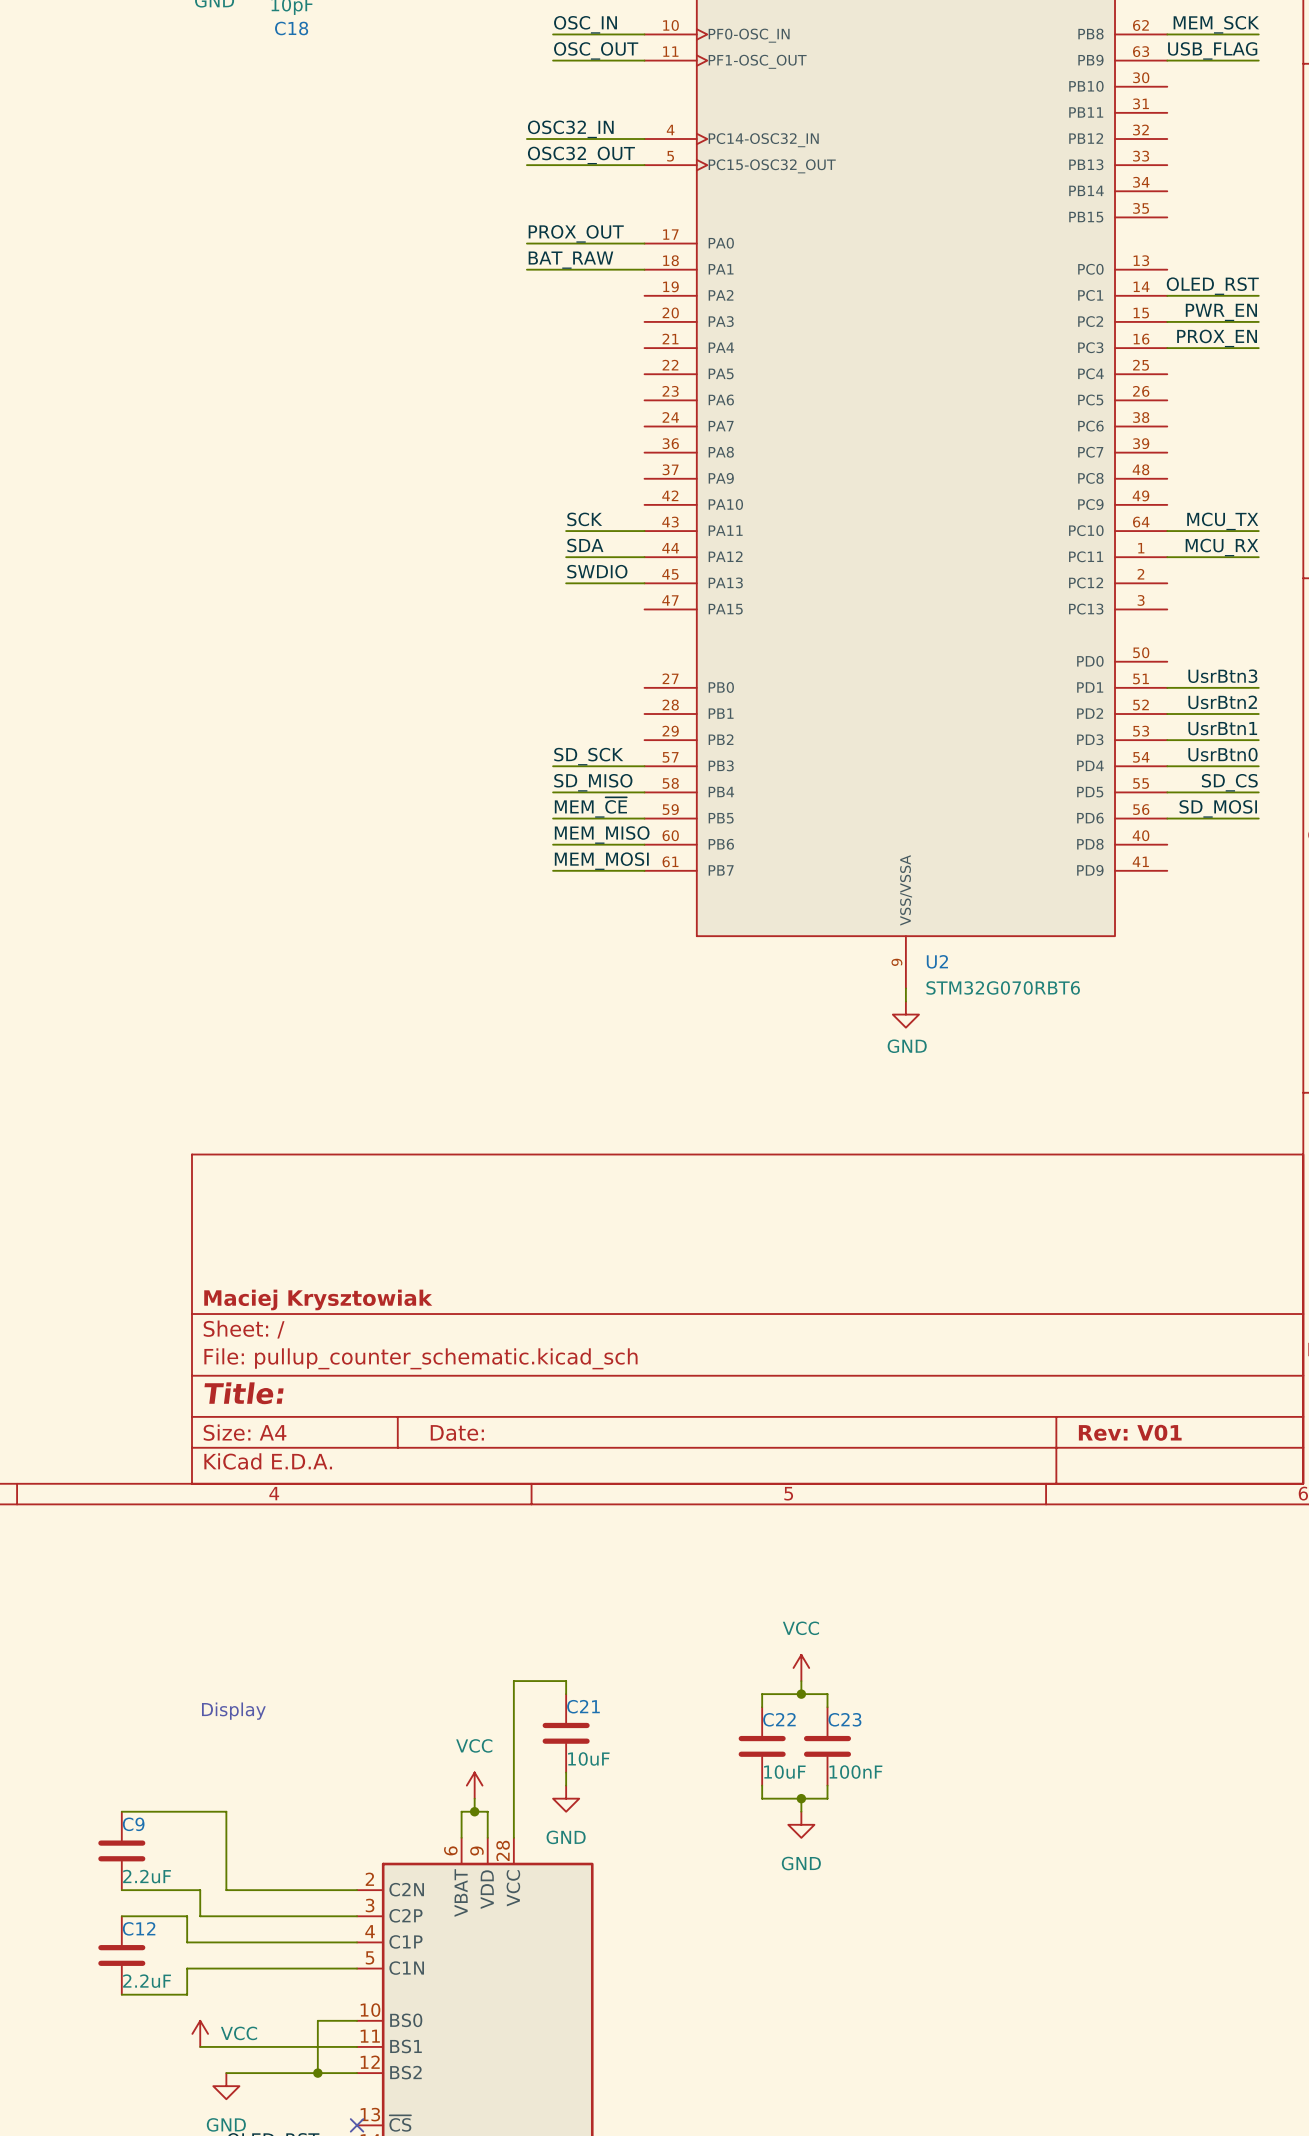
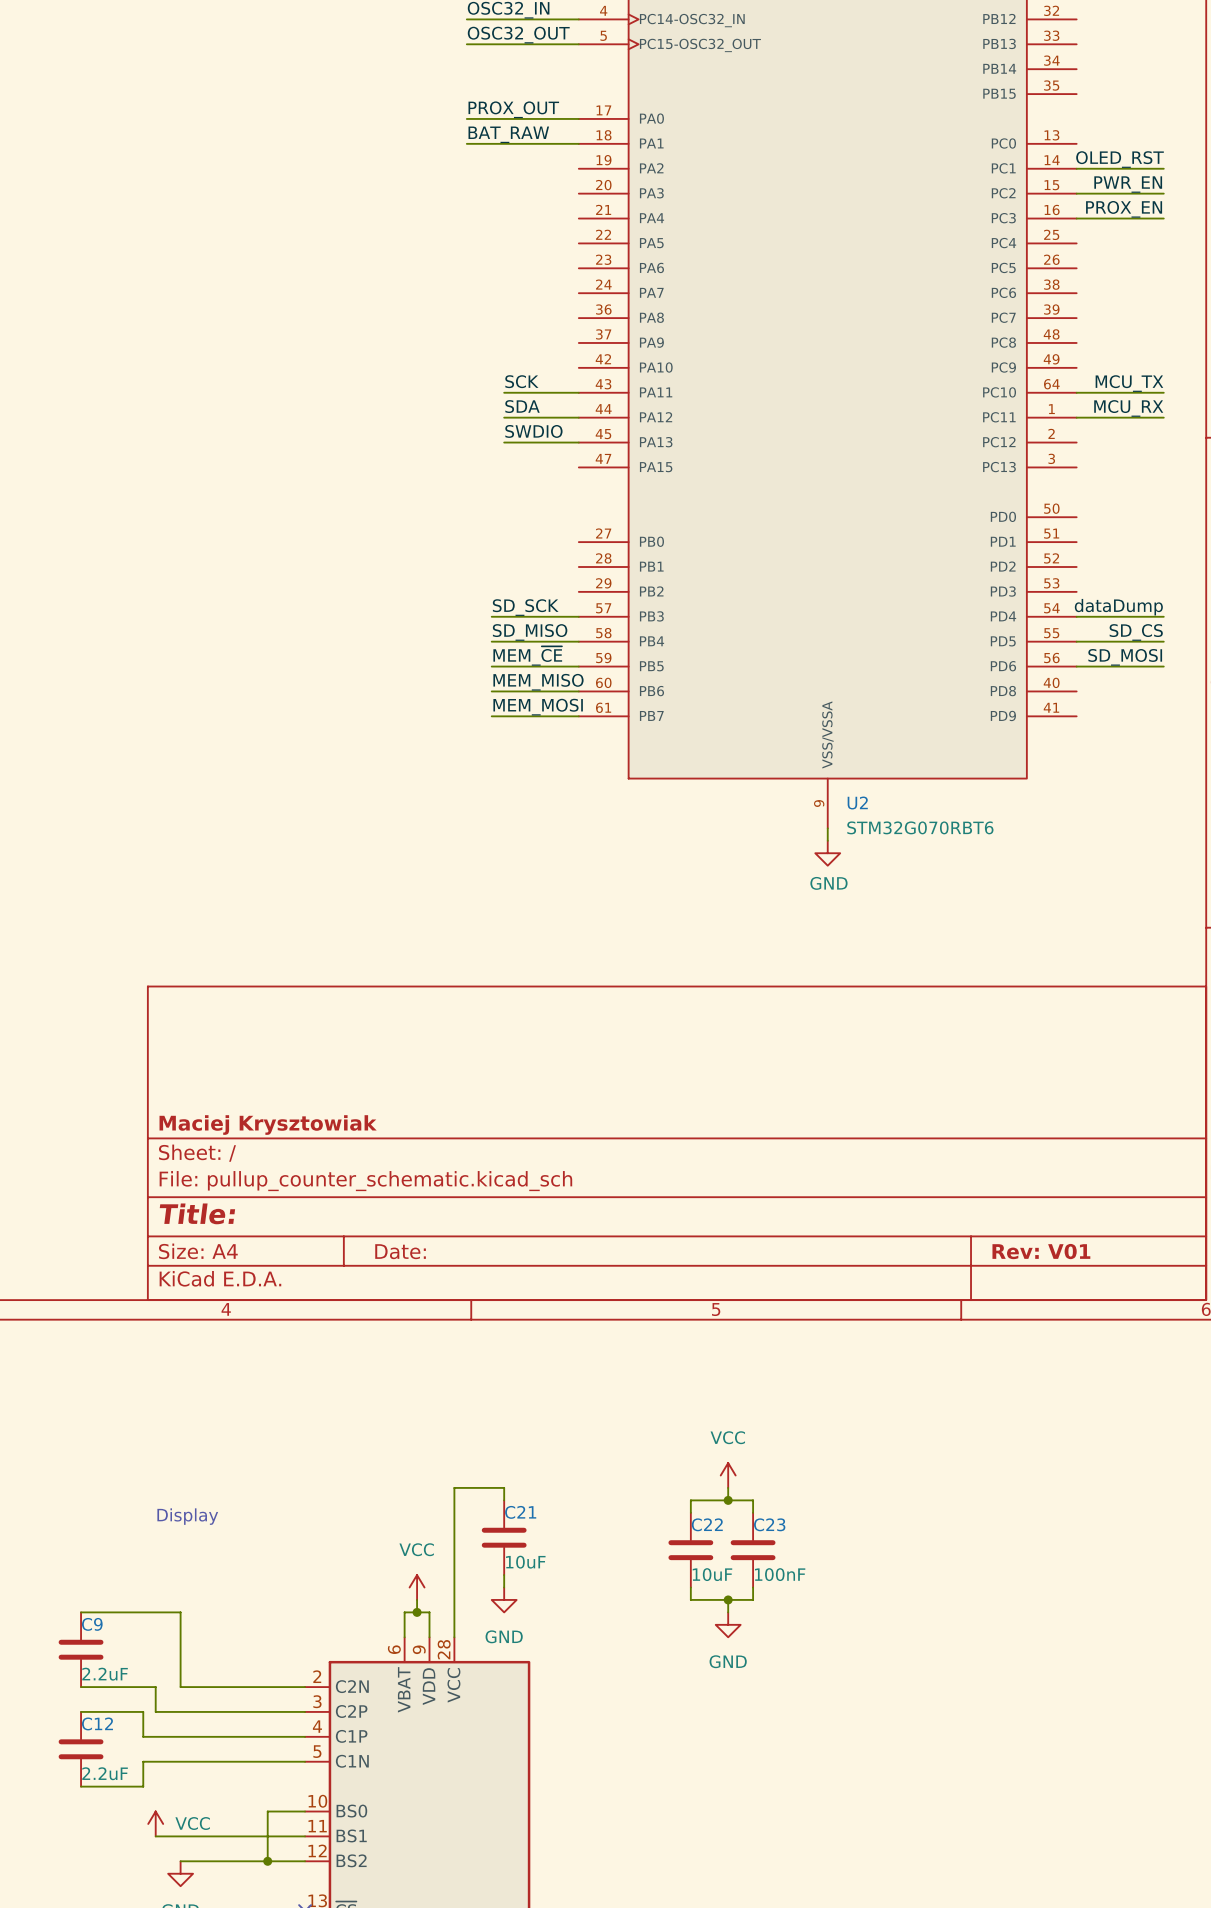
label: UsrBtn3 (1222, 676) -> none
wire: (1167, 687) (1258, 687) -> none
label: UsrBtn2 (1222, 702) -> none
wire: (1167, 714) (1258, 714) -> none
label: UsrBtn1 (1222, 728) -> none
wire: (1167, 740) (1258, 740) -> none
label: UsrBtn0 (1222, 754) -> dataDump (1118, 607)

